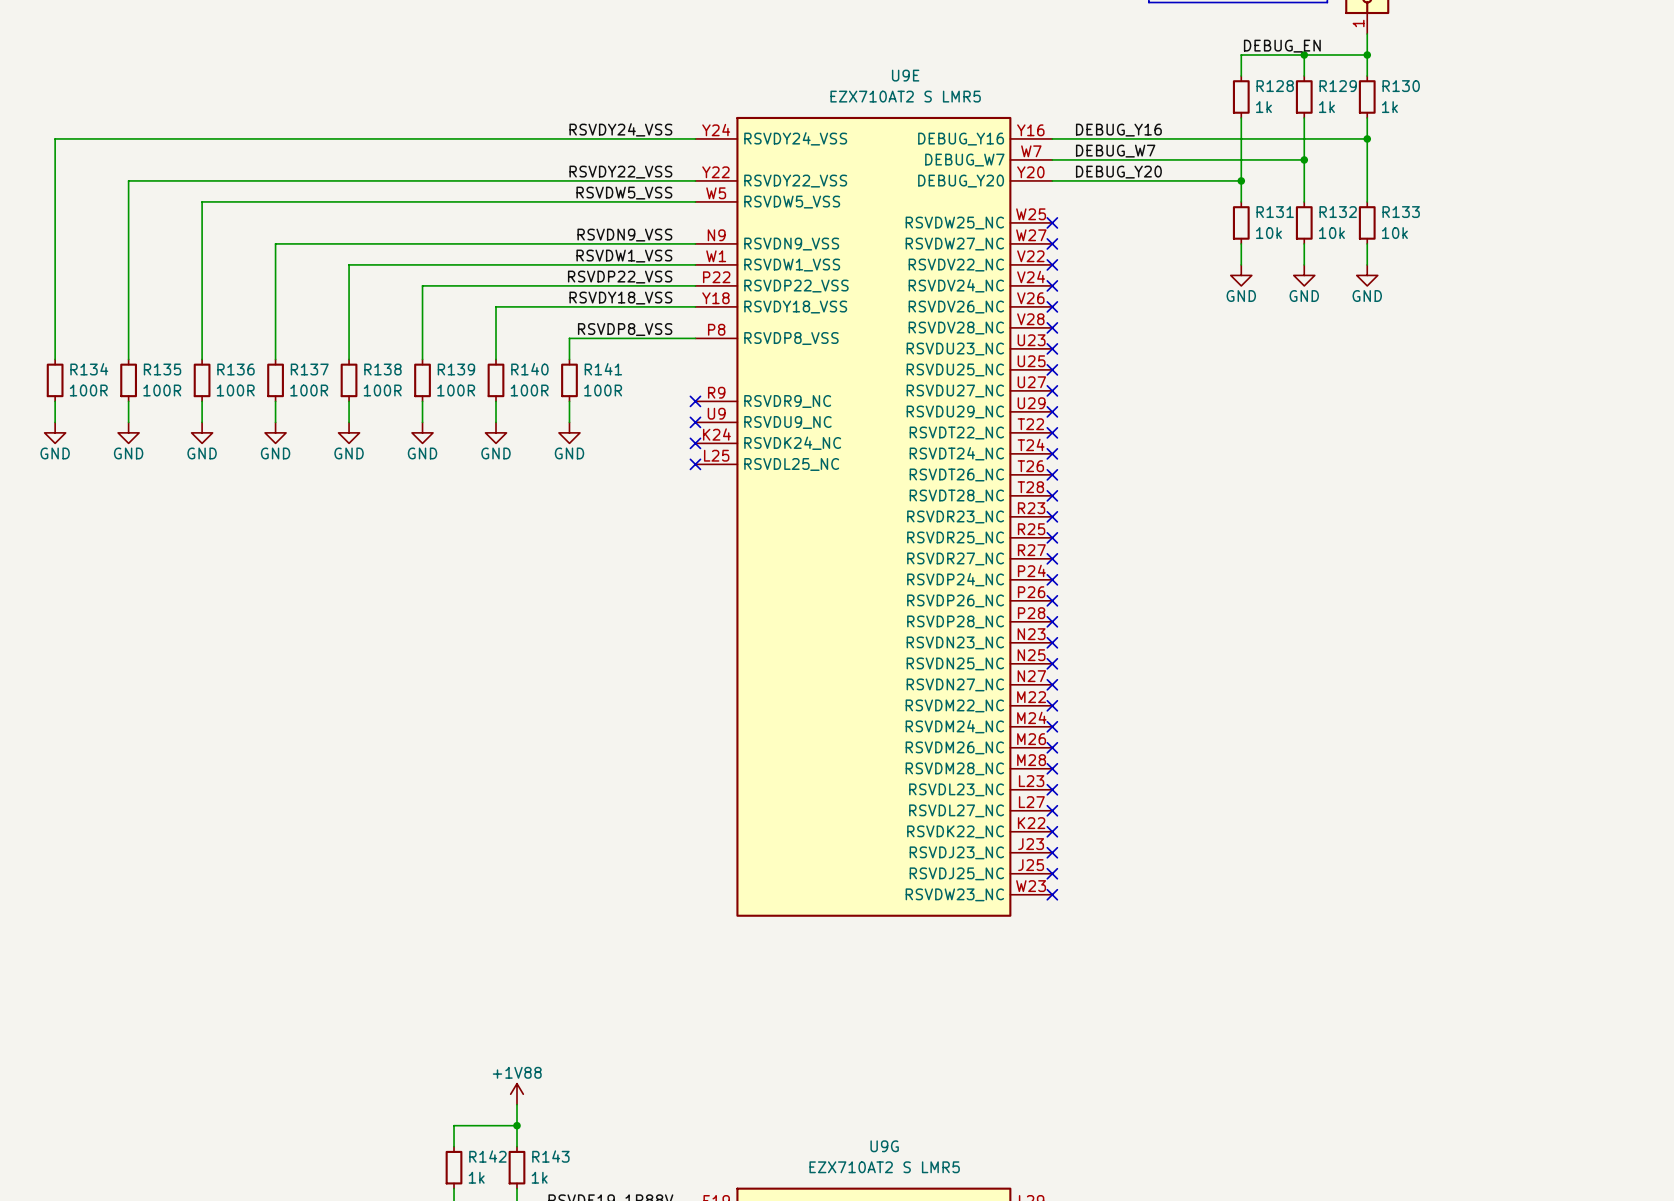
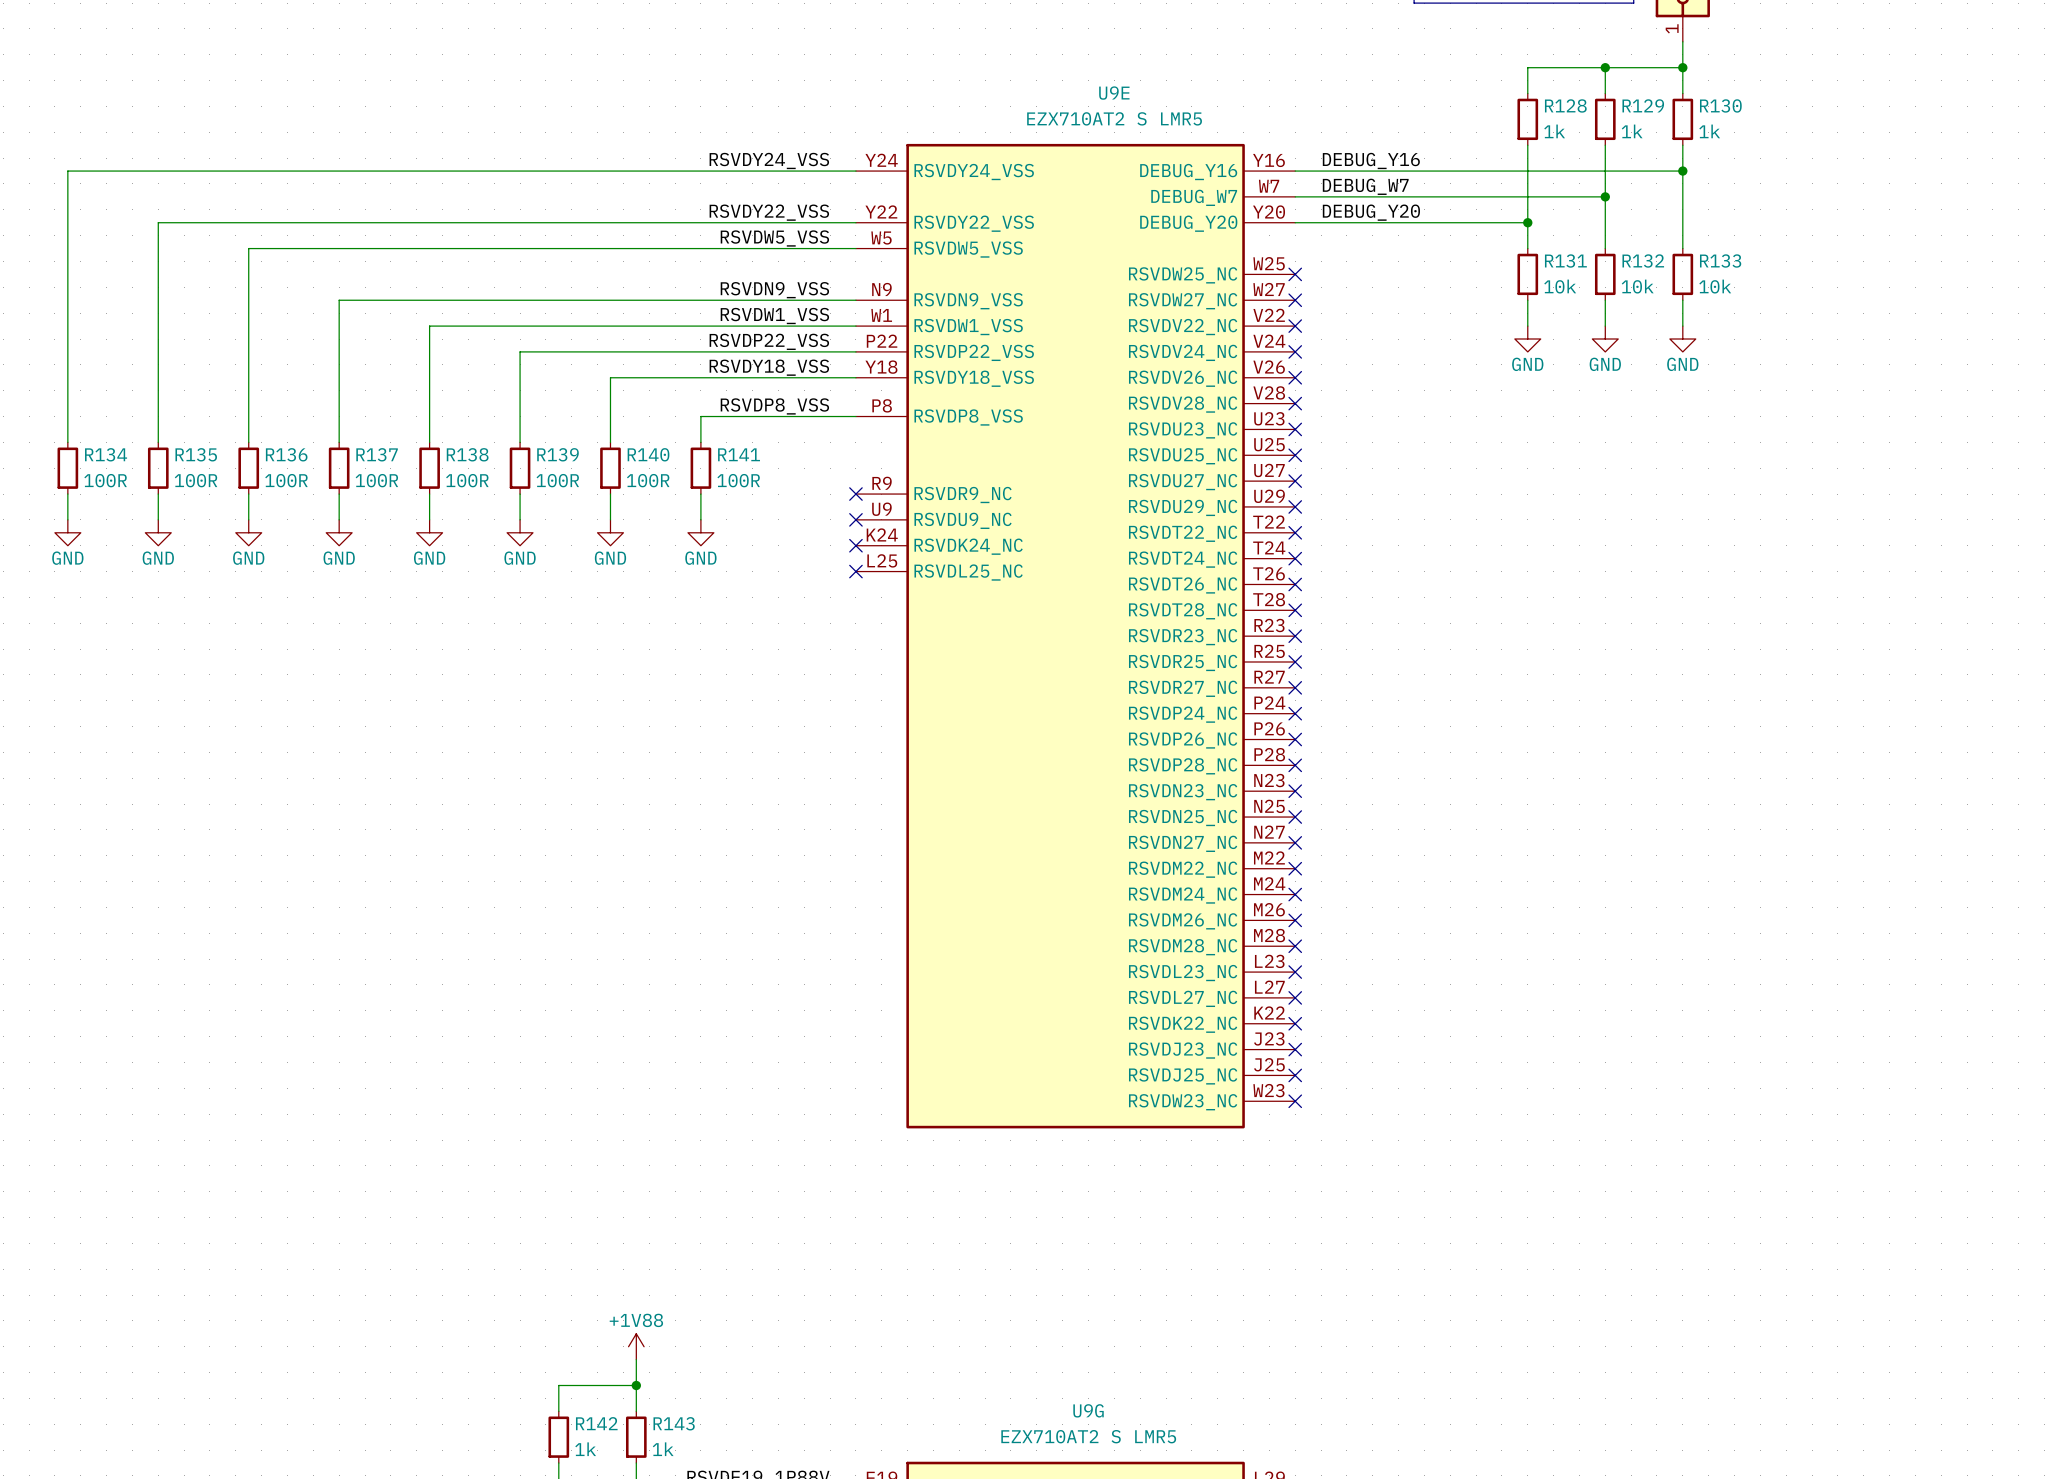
label: DEBUG_EN (1282, 46) -> none

